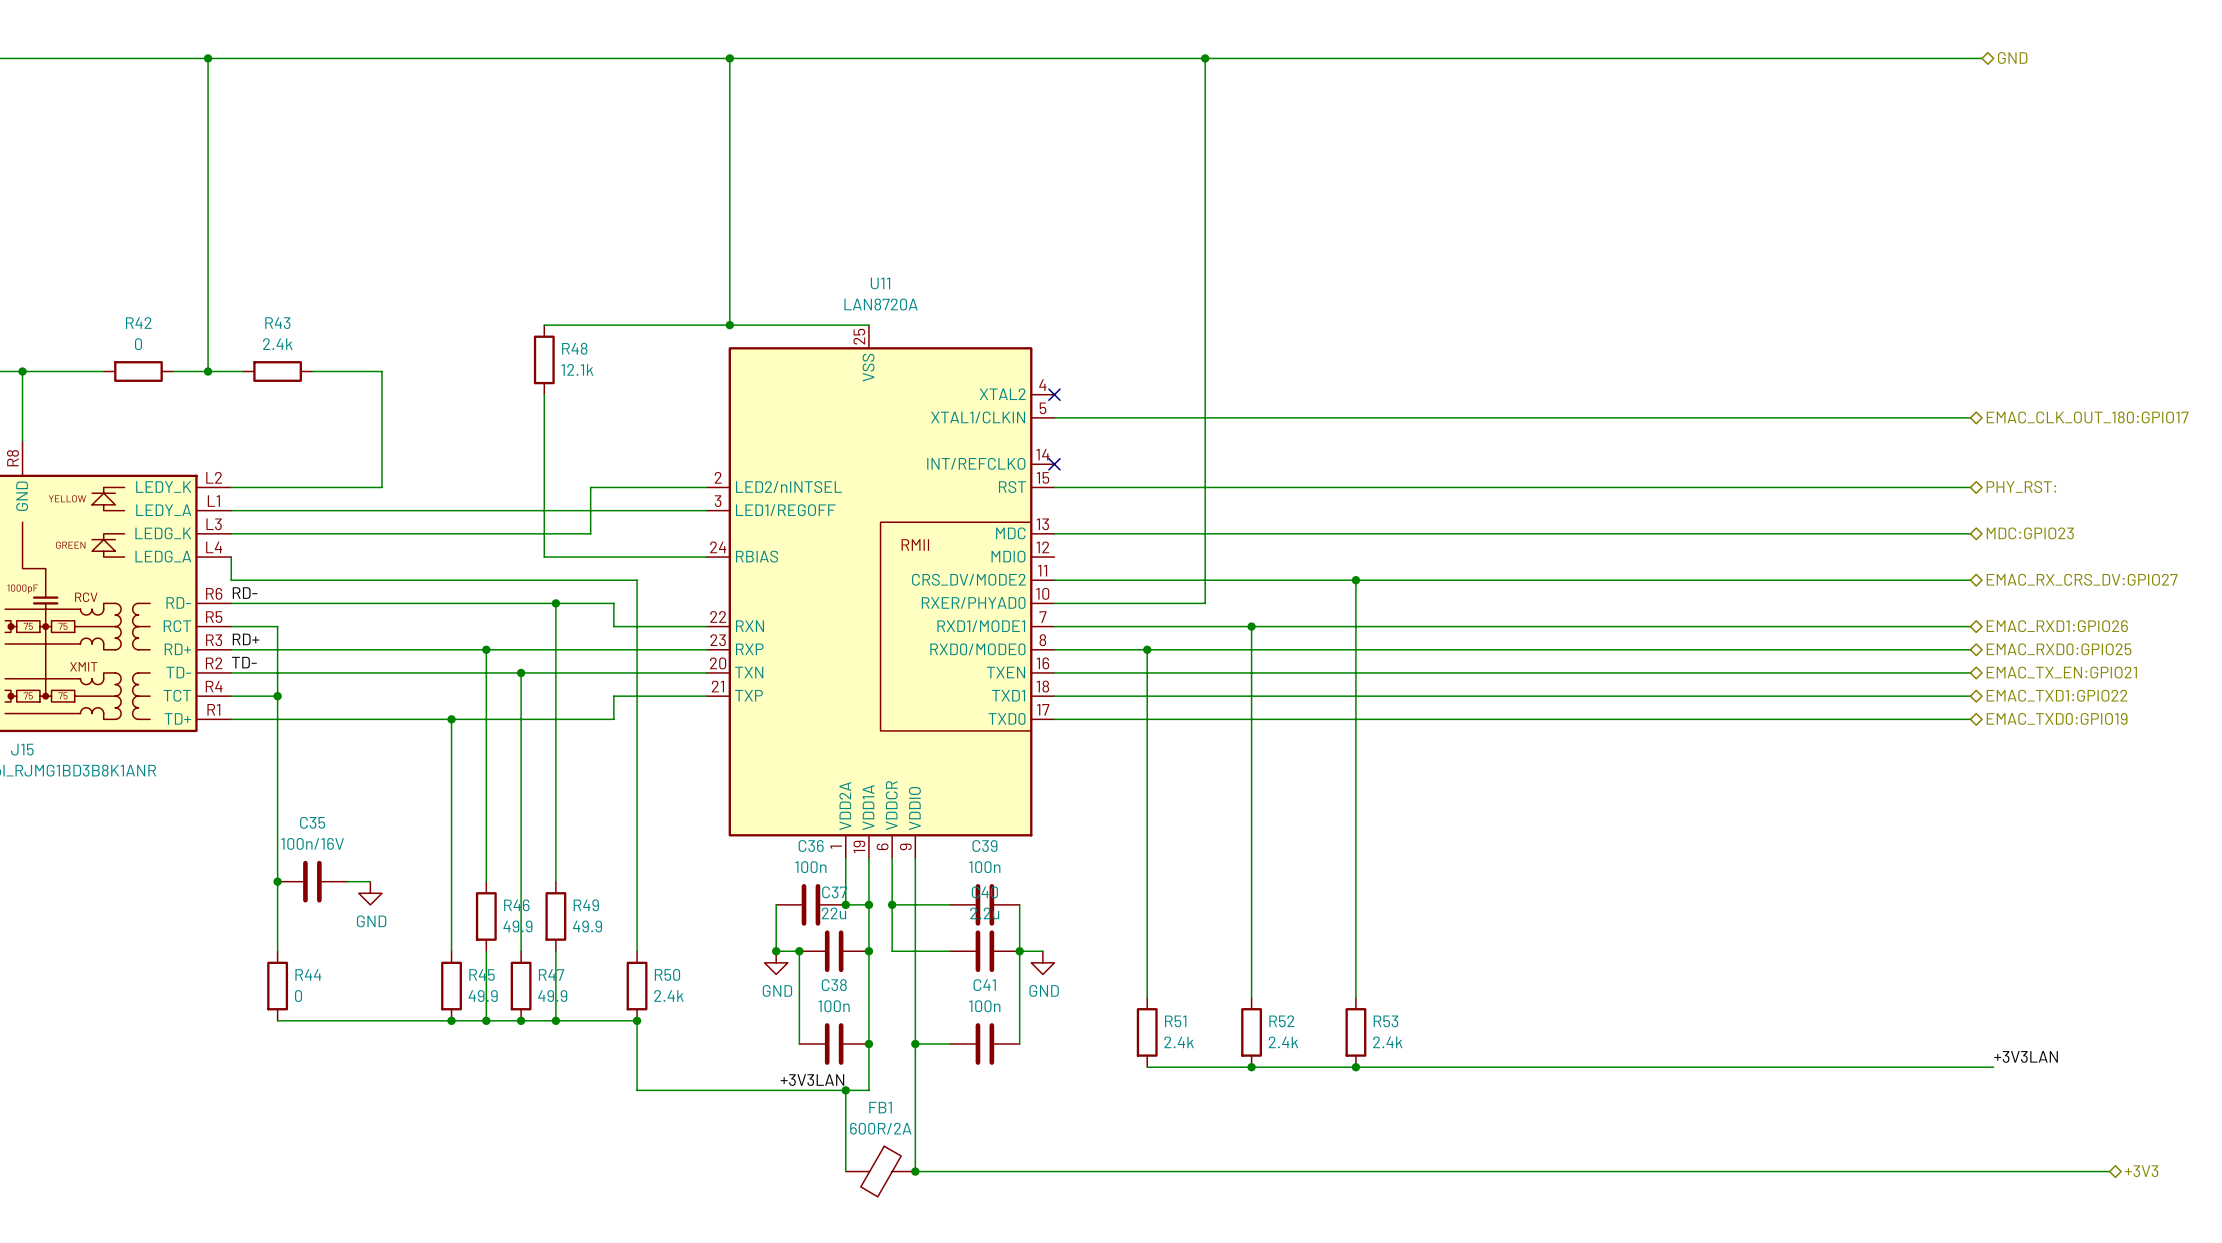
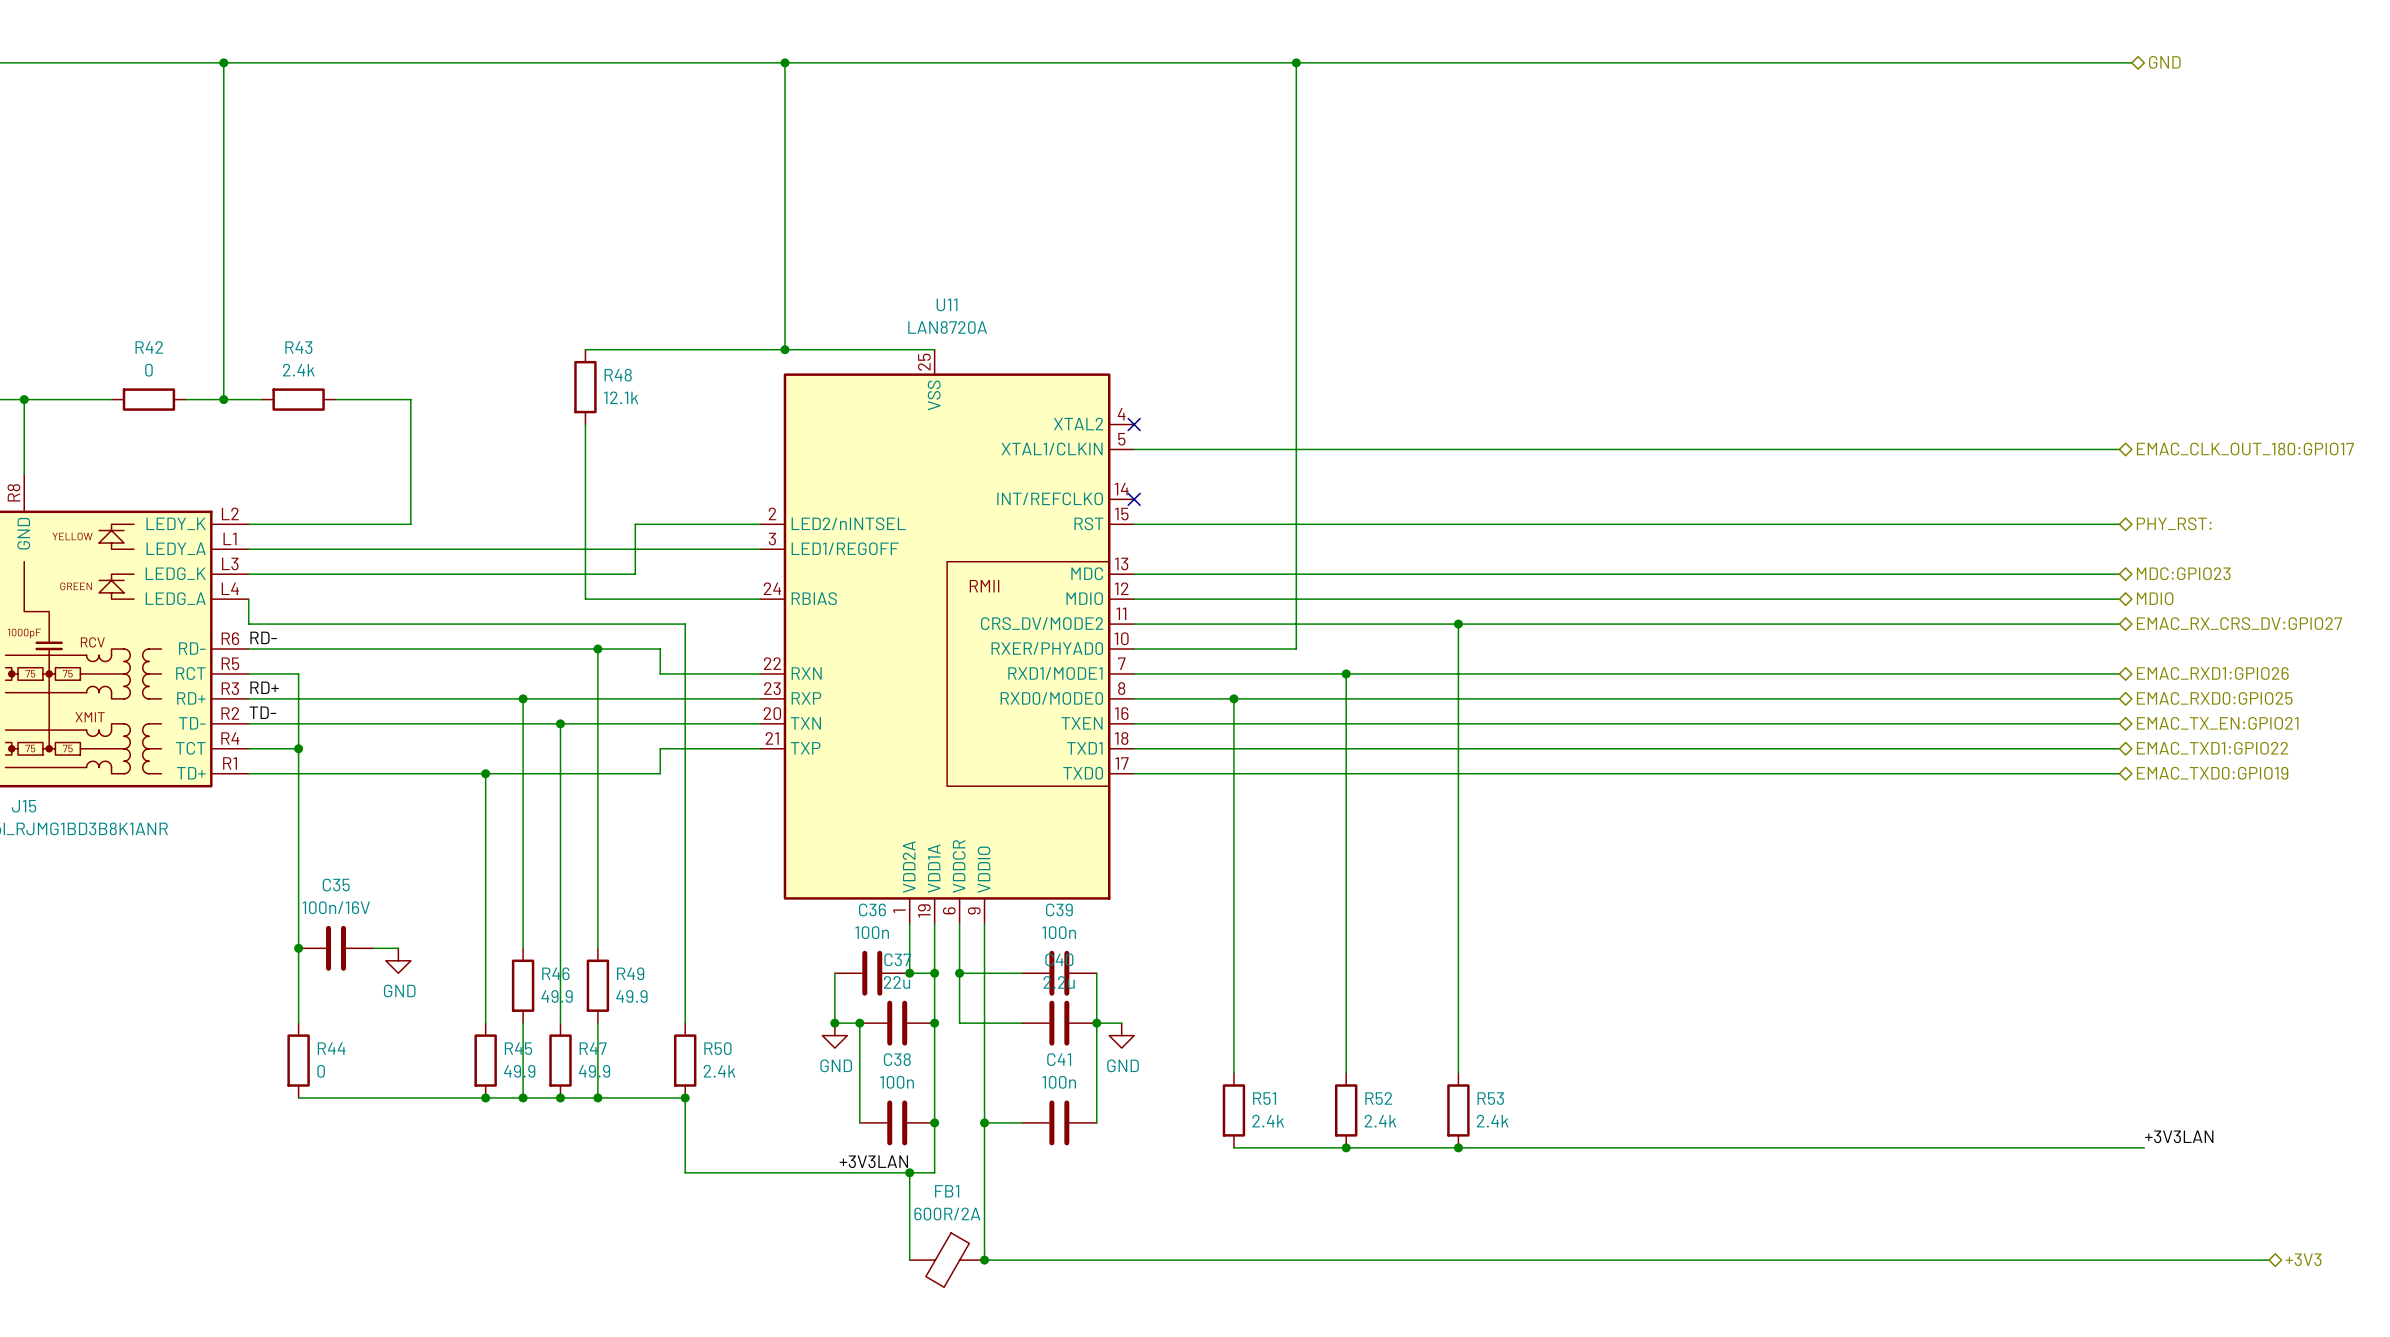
hierarchical label: none -> MDIO (2155, 598)
wire: none -> (1134, 599) (2119, 599)

